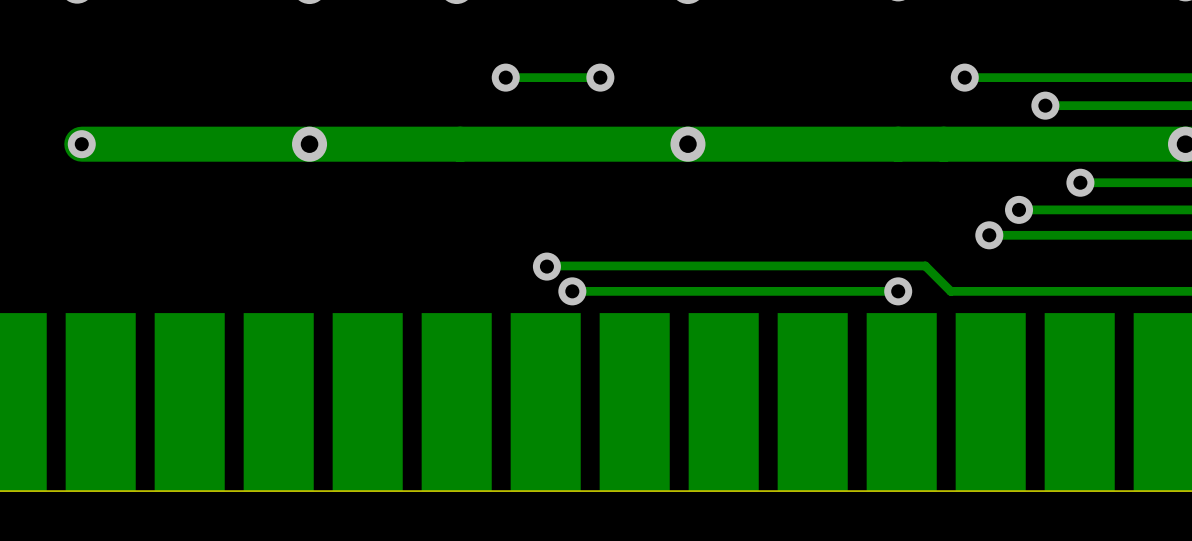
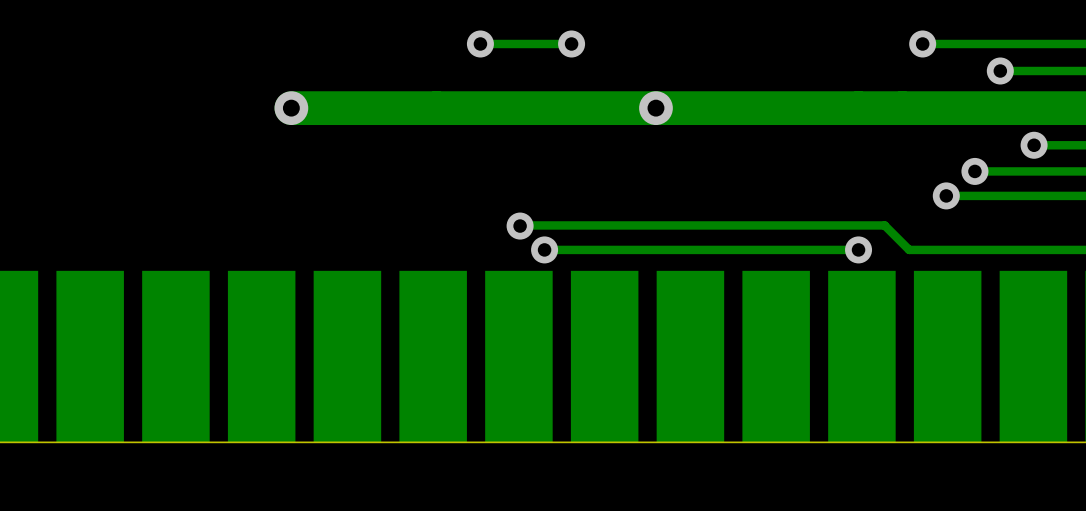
via: (81, 144) -> none
track: (309, 144) (81, 144) -> none

